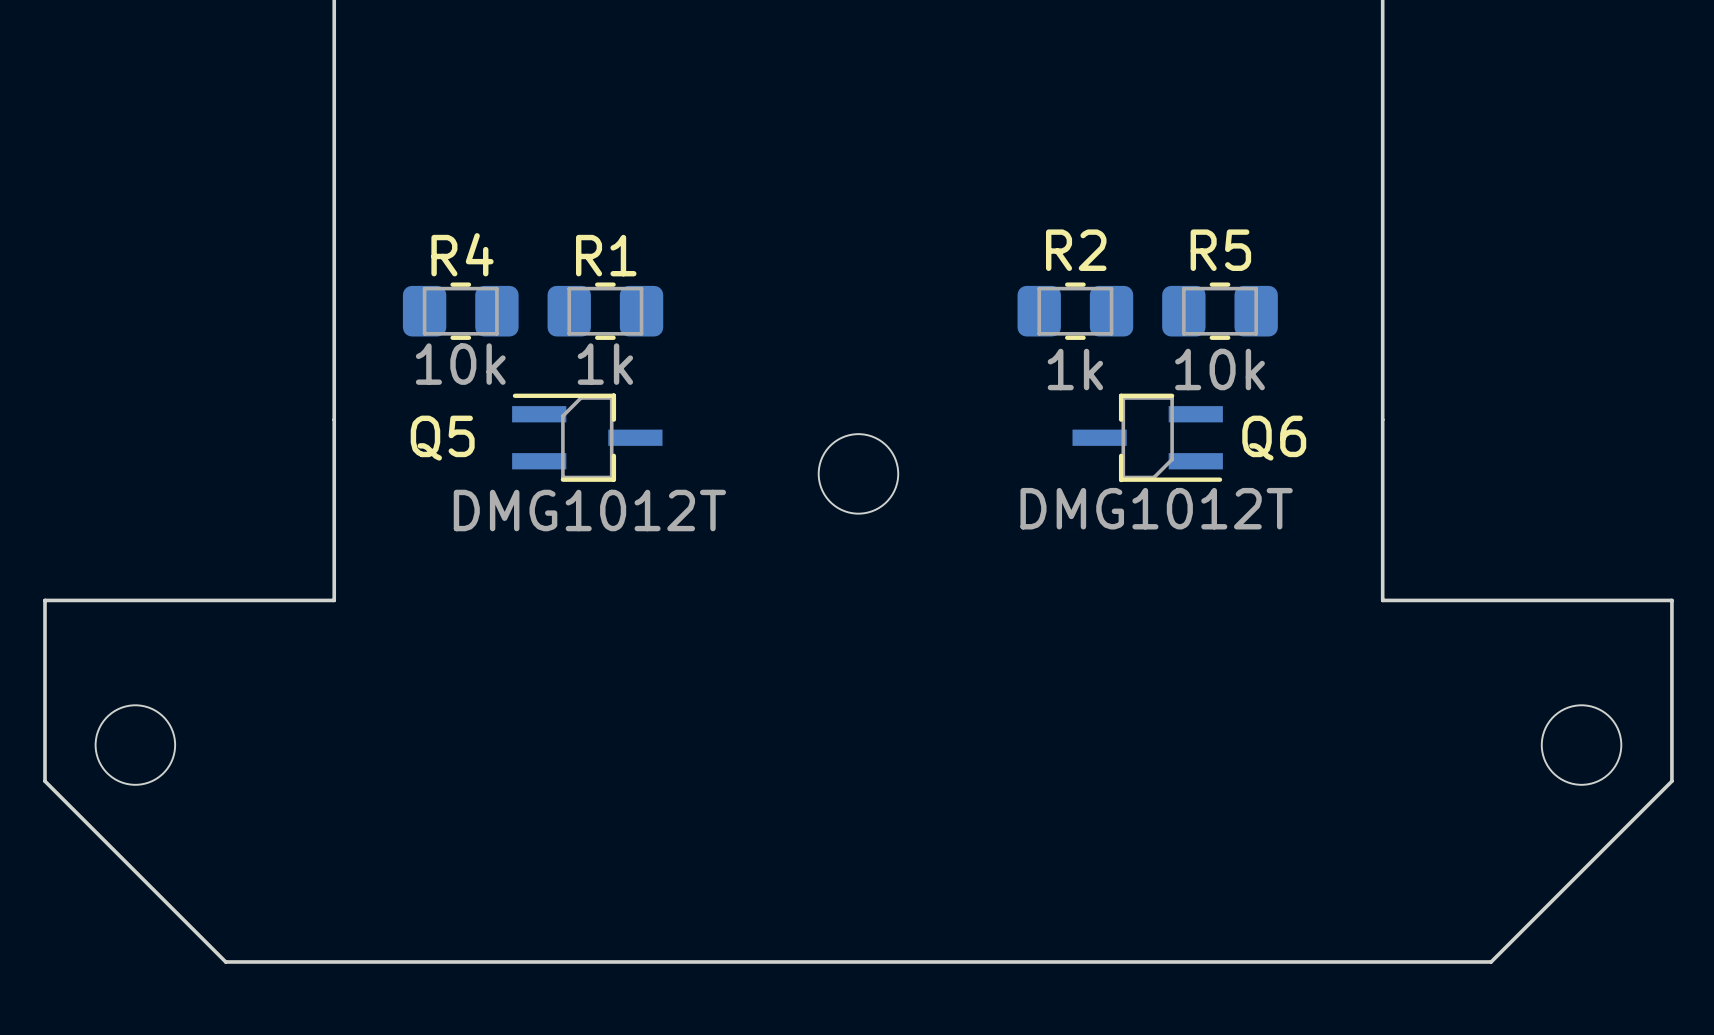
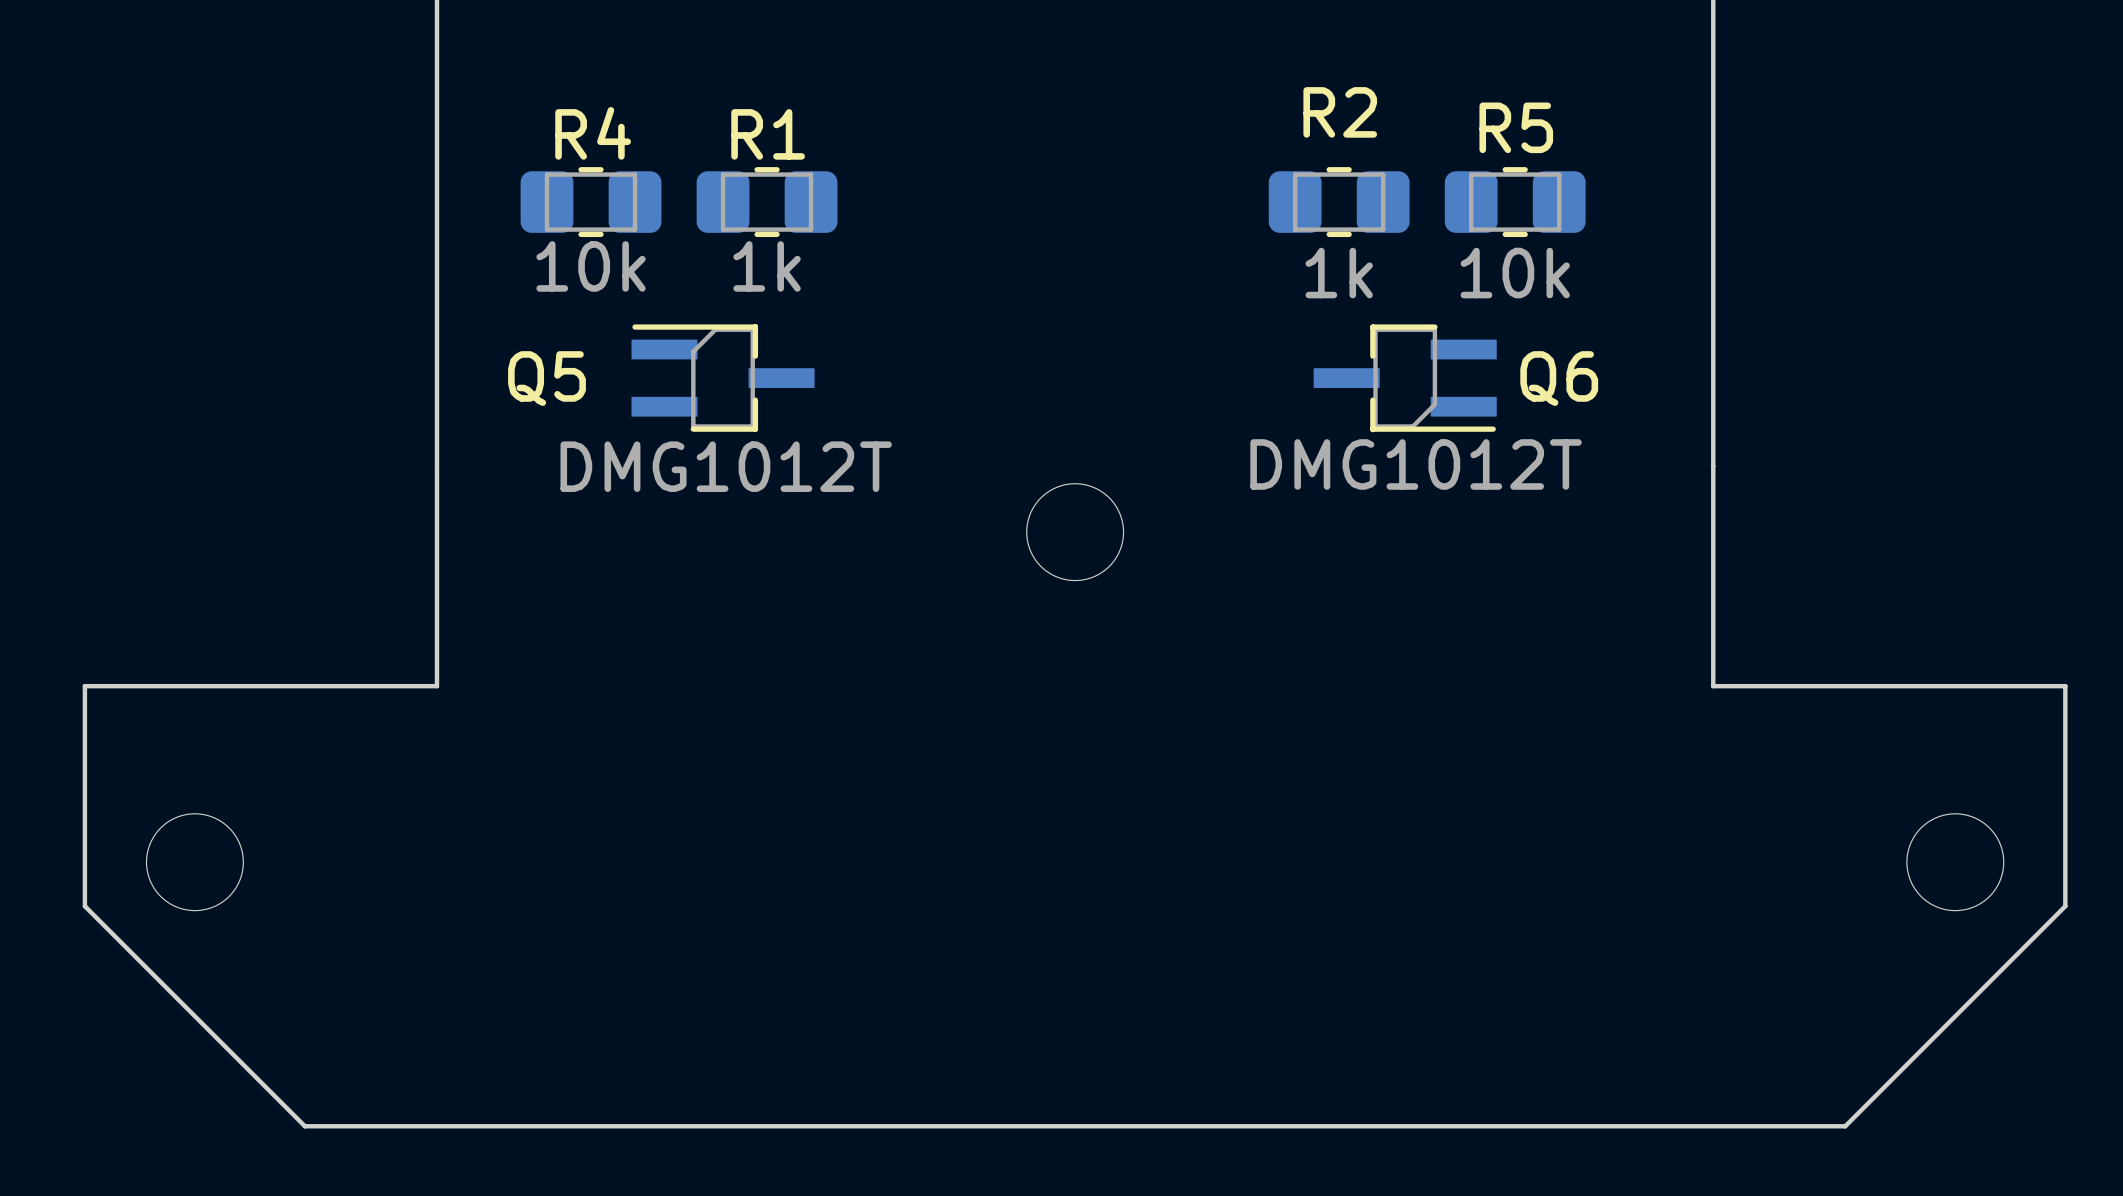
R2 name position: R2 (1076, 250) -> R2 (1340, 112)
R4 position: (460, 311) -> (591, 202)
R1 position: (605, 311) -> (767, 202)
R2 position: (1075, 311) -> (1339, 202)
R5 position: (1220, 311) -> (1515, 202)
Q5 position: (587, 437) -> (723, 377)
Q6 position: (1147, 437) -> (1405, 378)

